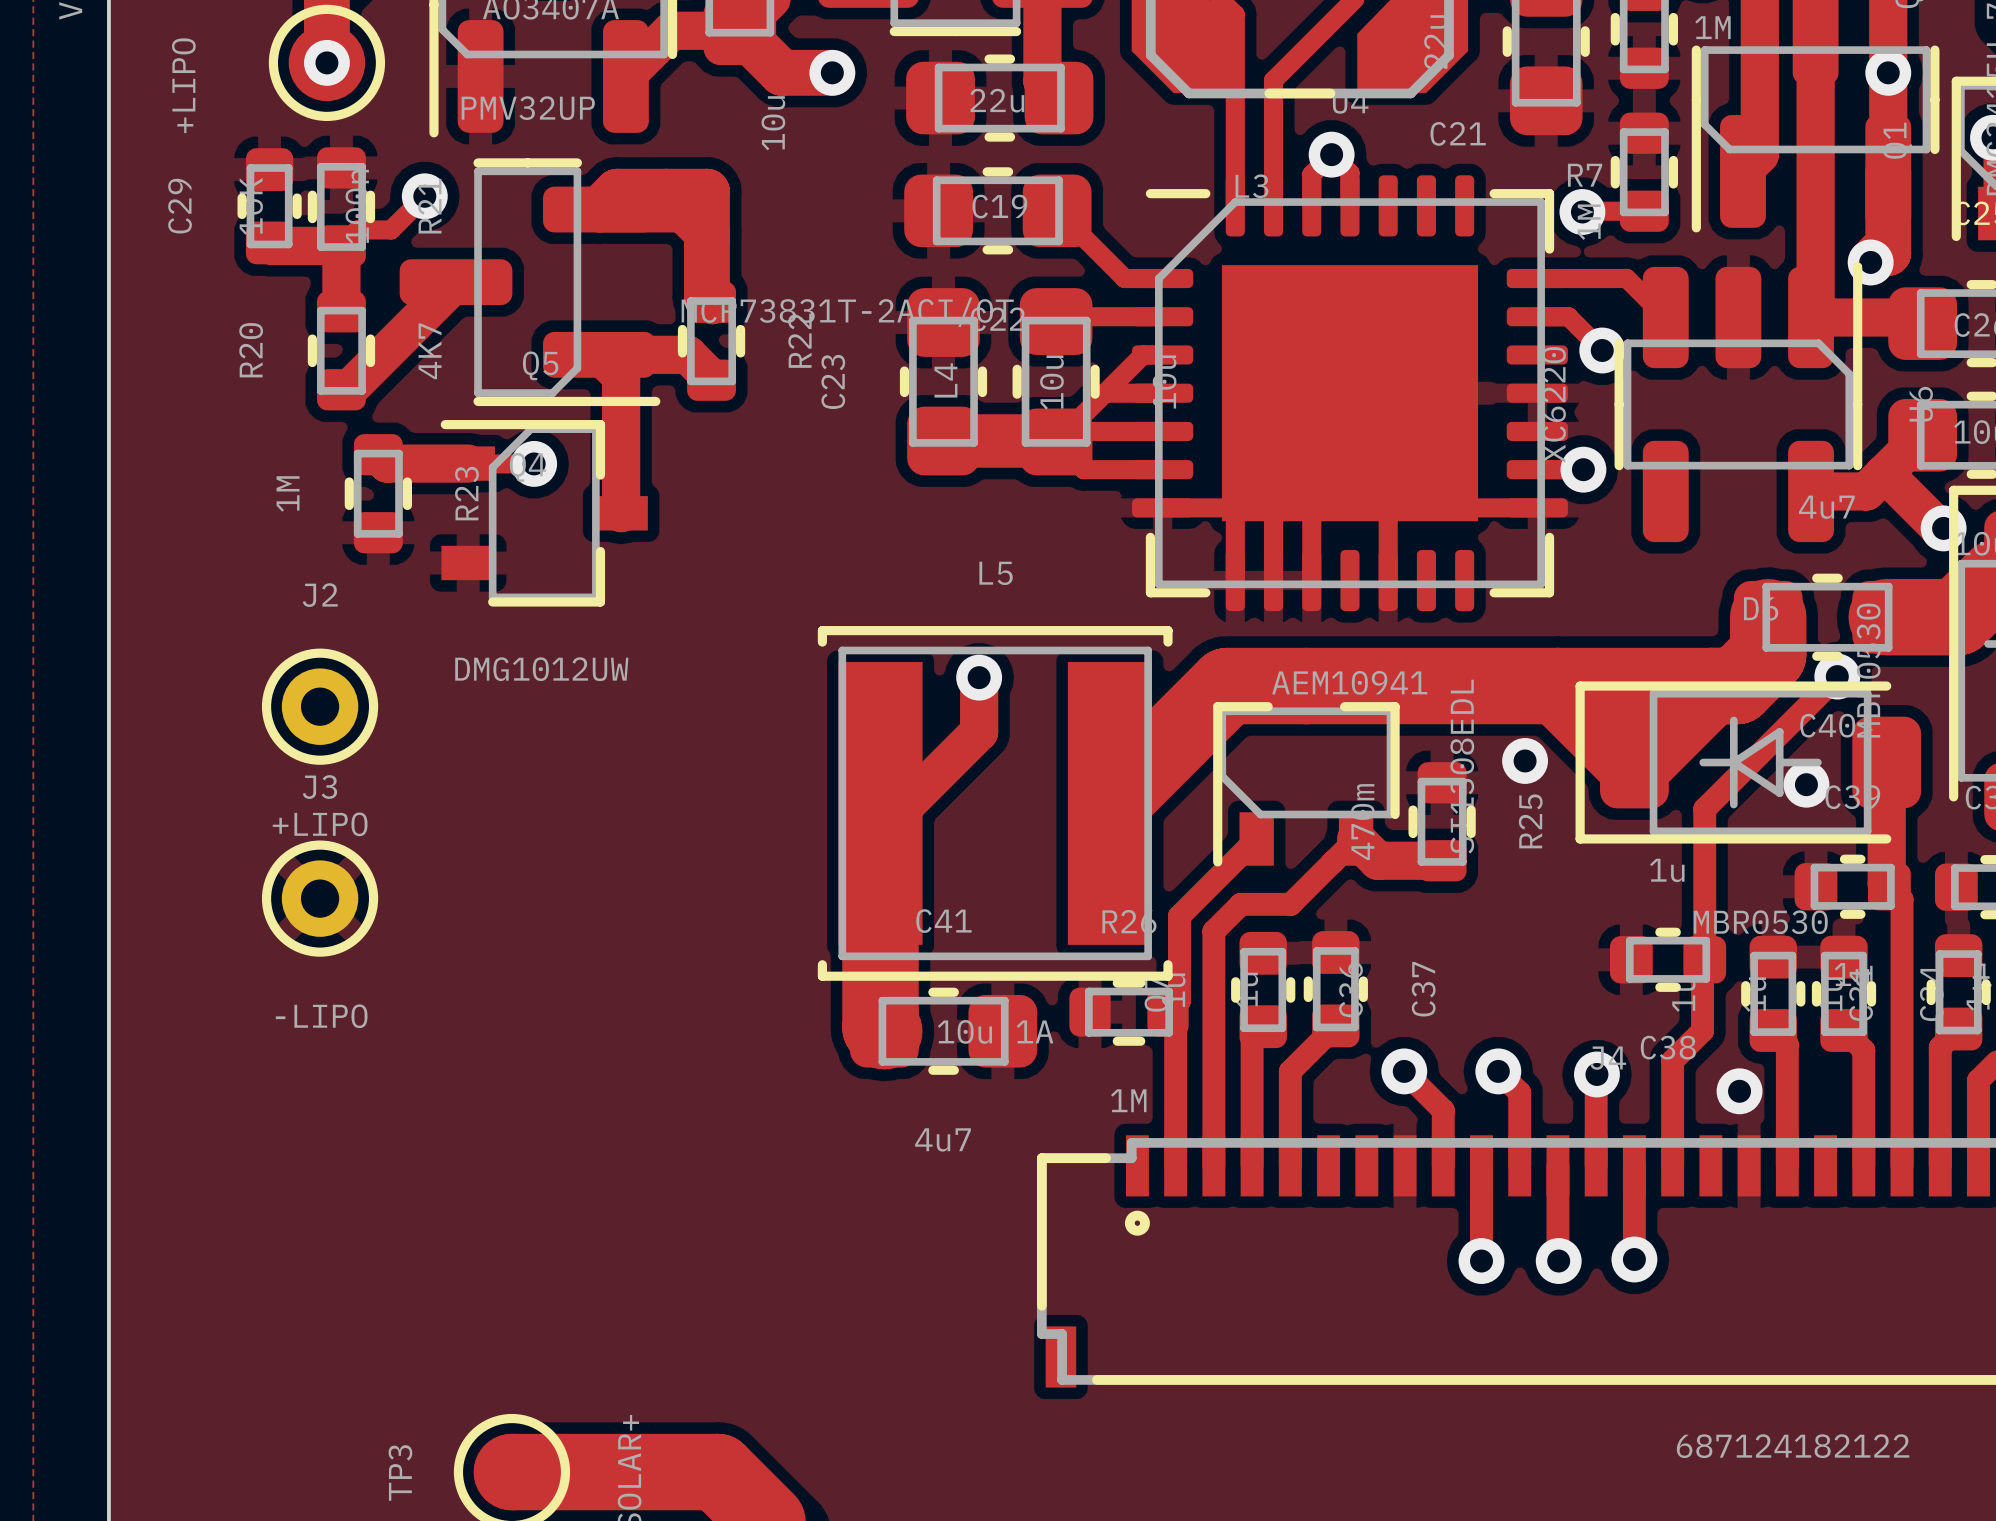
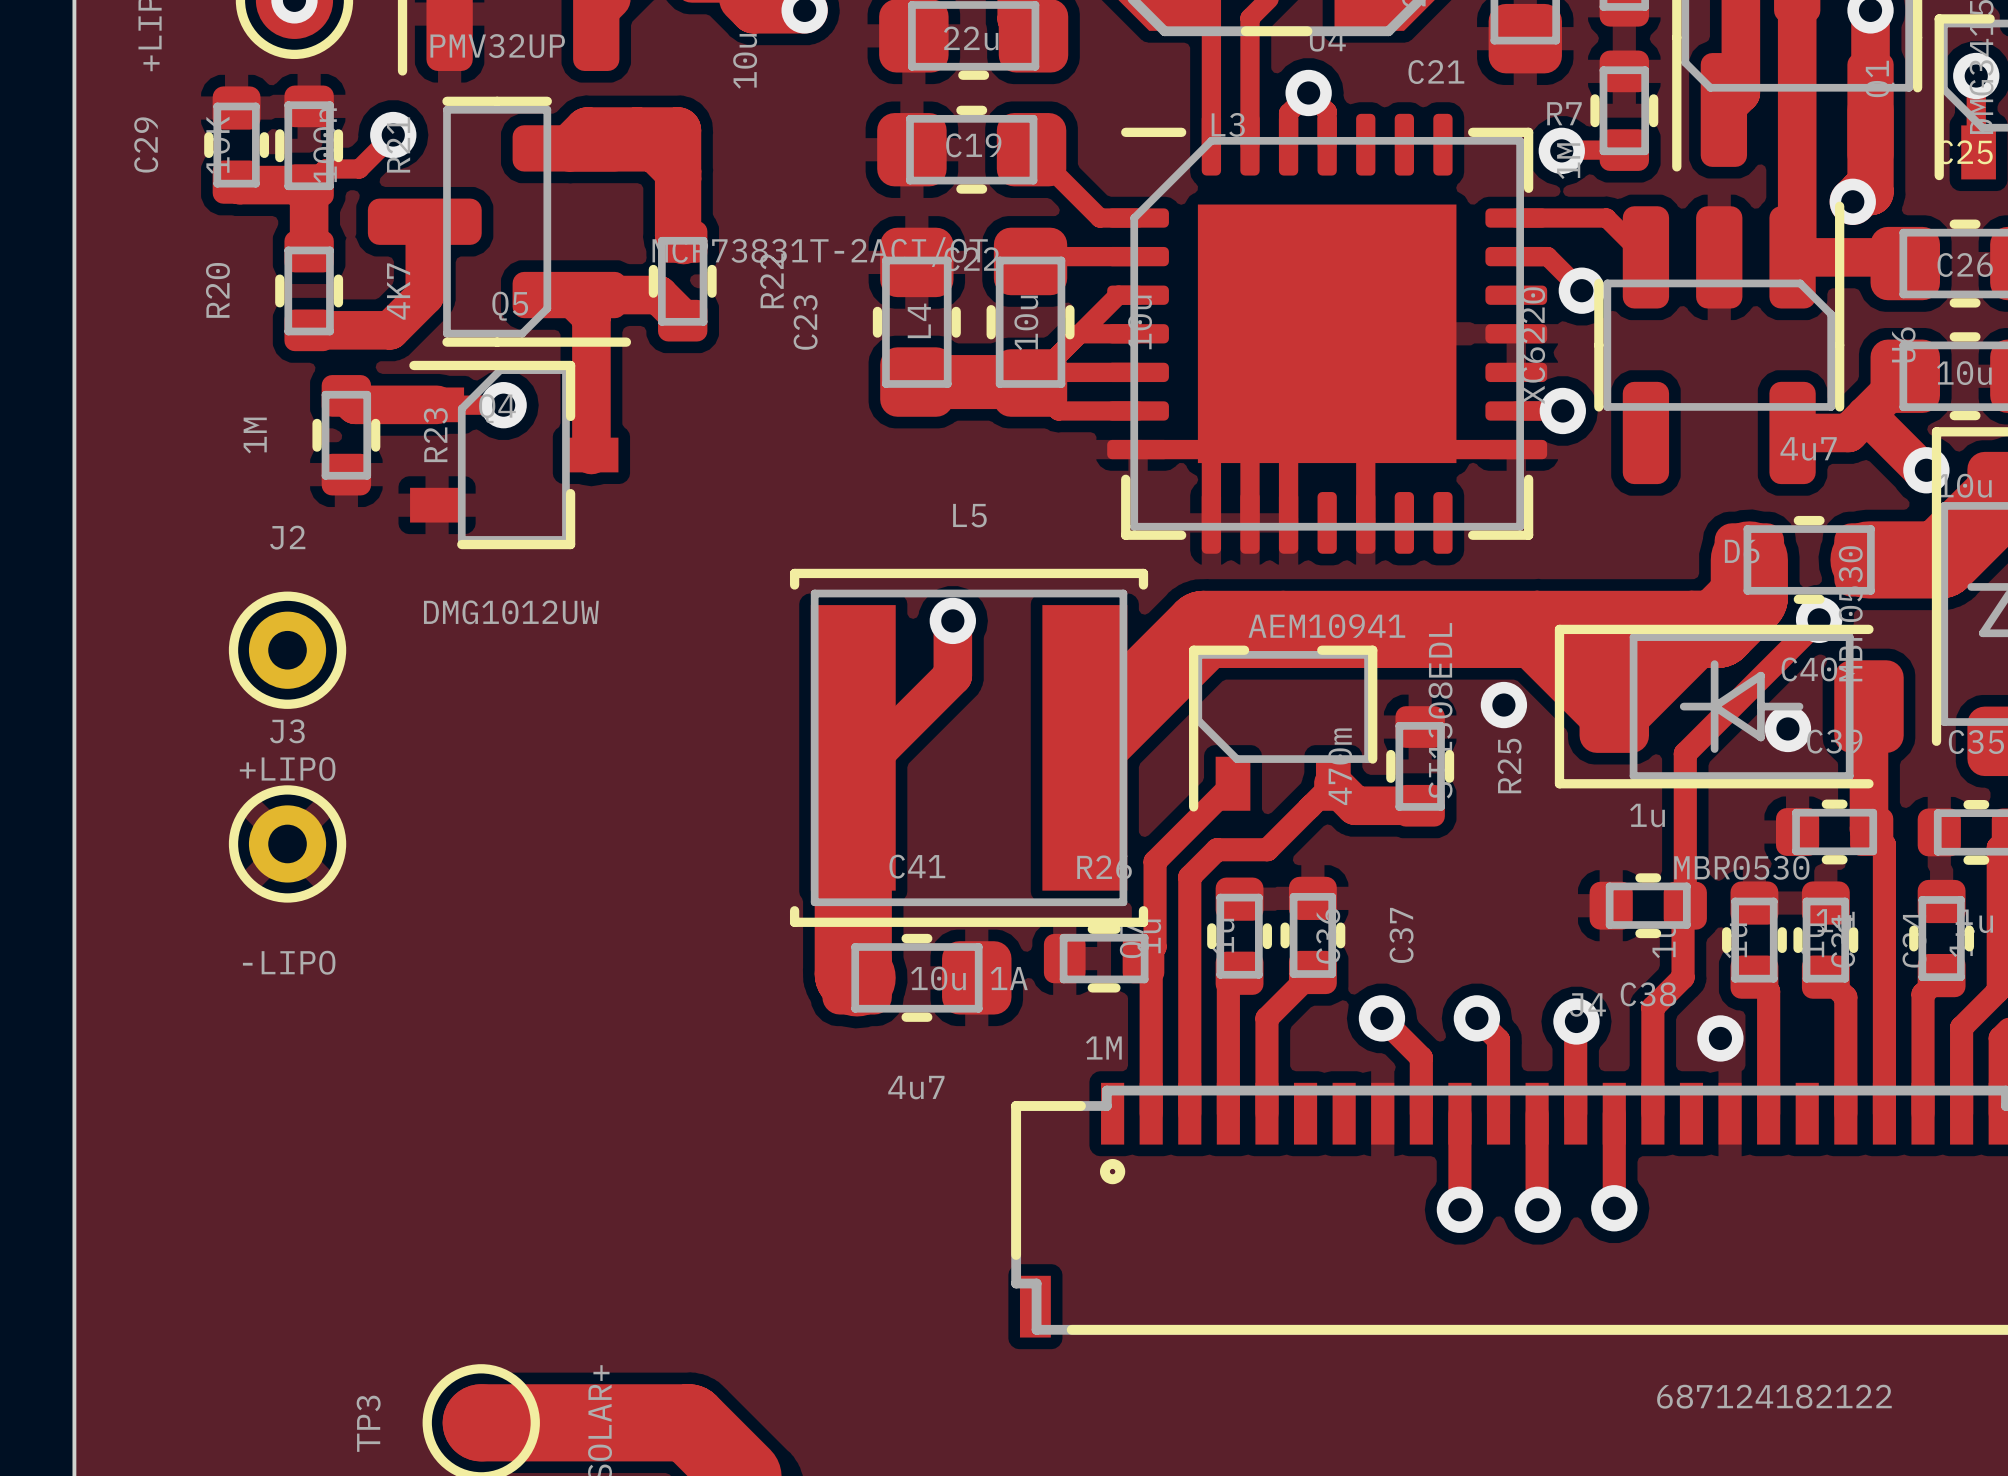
track: (456, 282) (348, 389) -> (424, 221) (424, 295) (390, 330) (316, 330)

